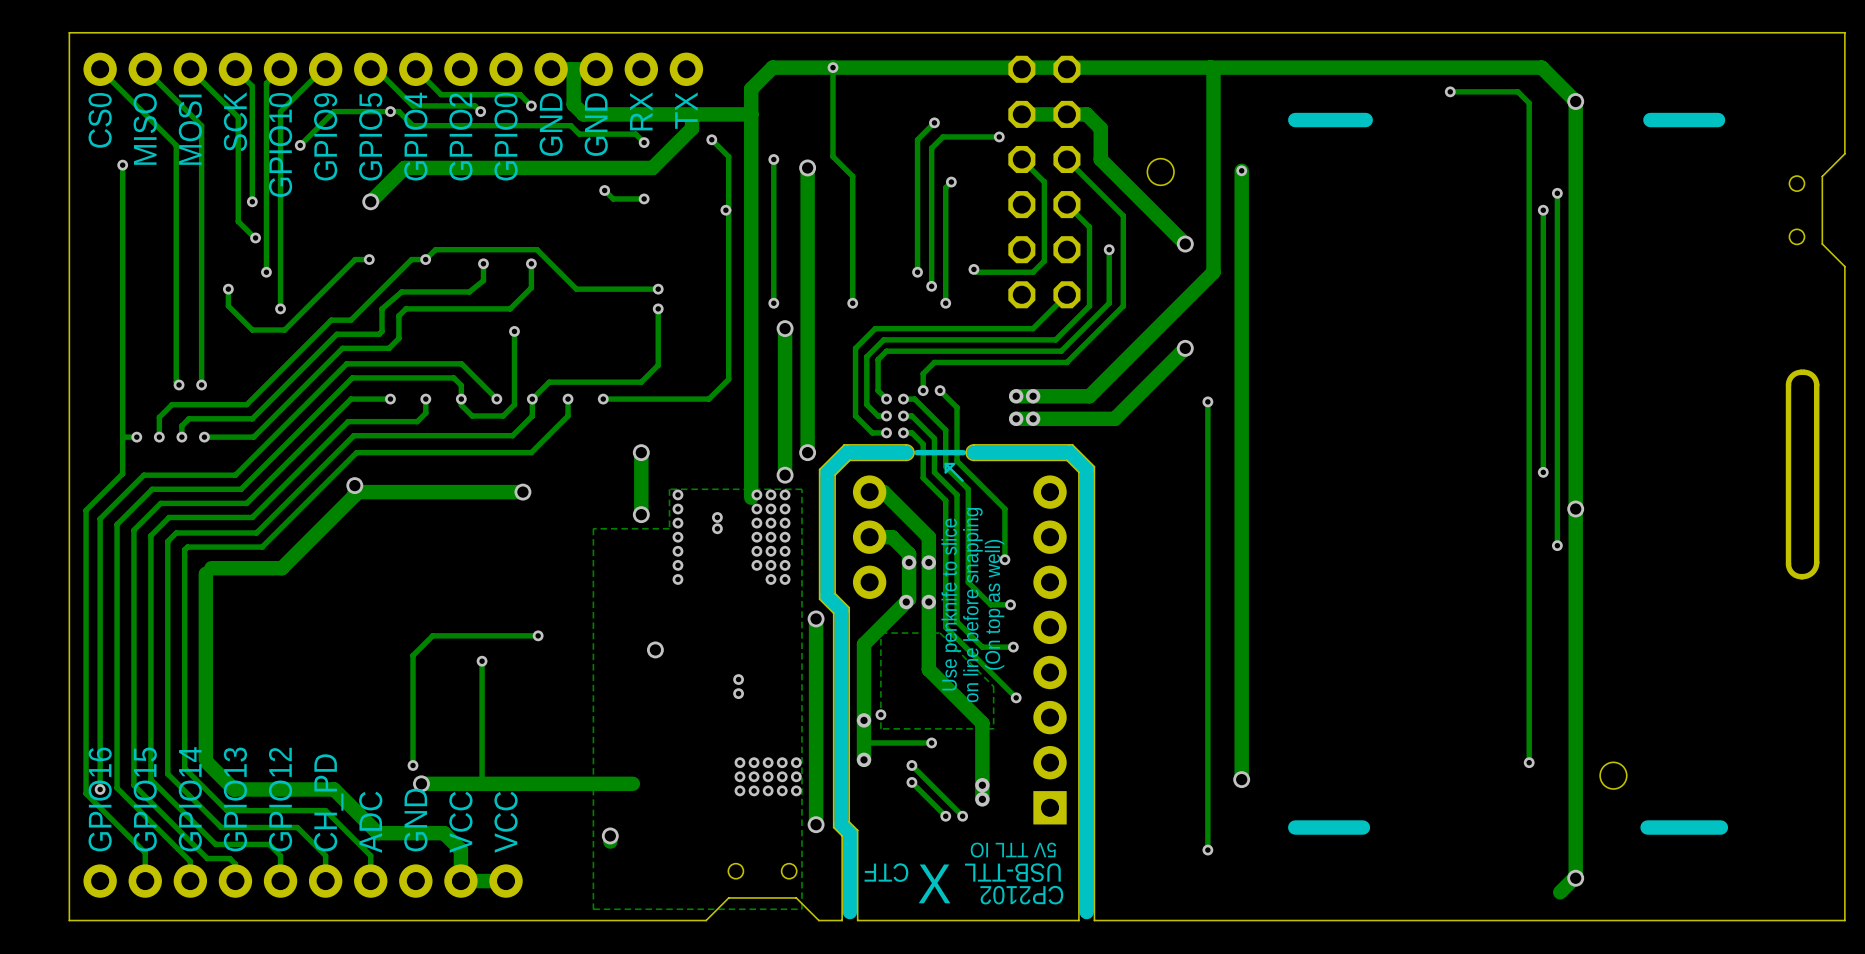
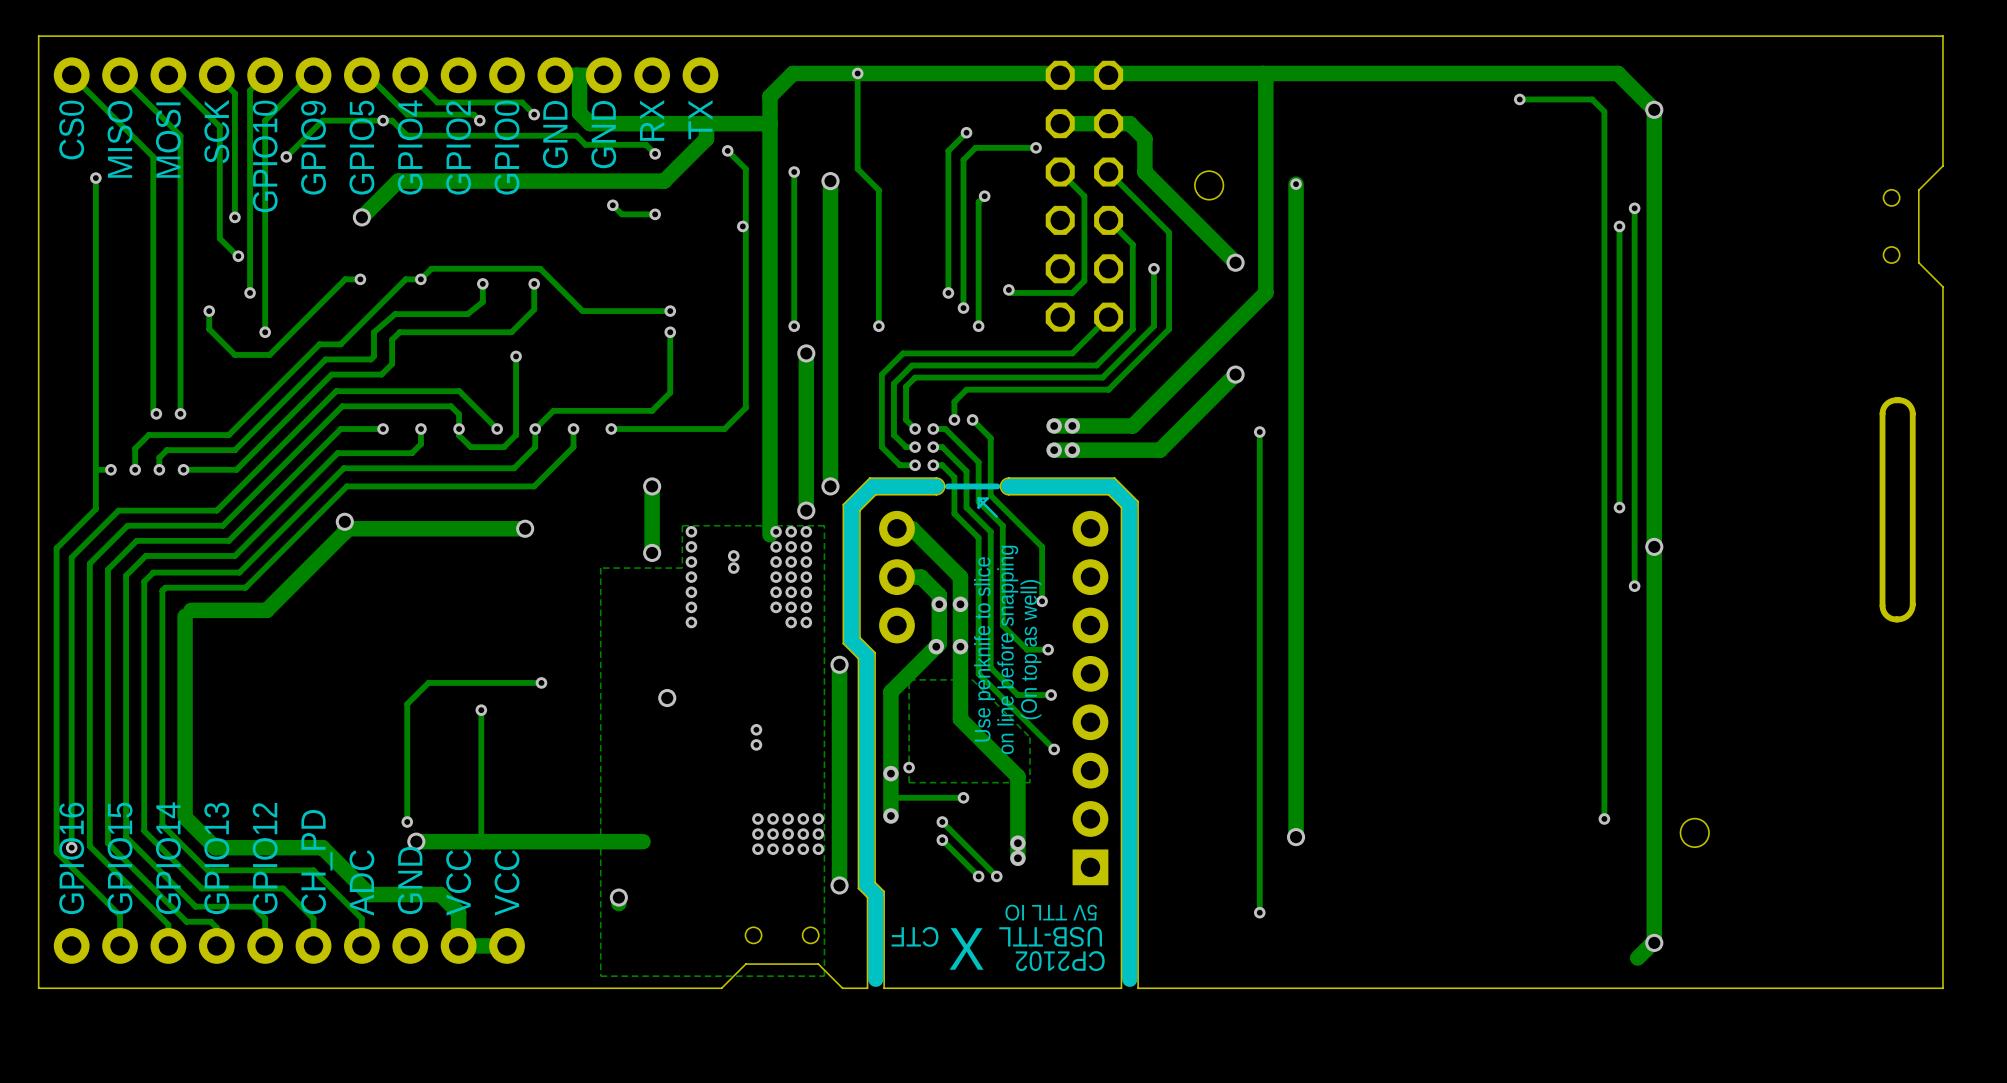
line: (1365, 120) (1295, 120) -> none
line: (1718, 120) (1650, 120) -> none
line: (1362, 827) (1295, 827) -> none
line: (1720, 827) (1647, 827) -> none

